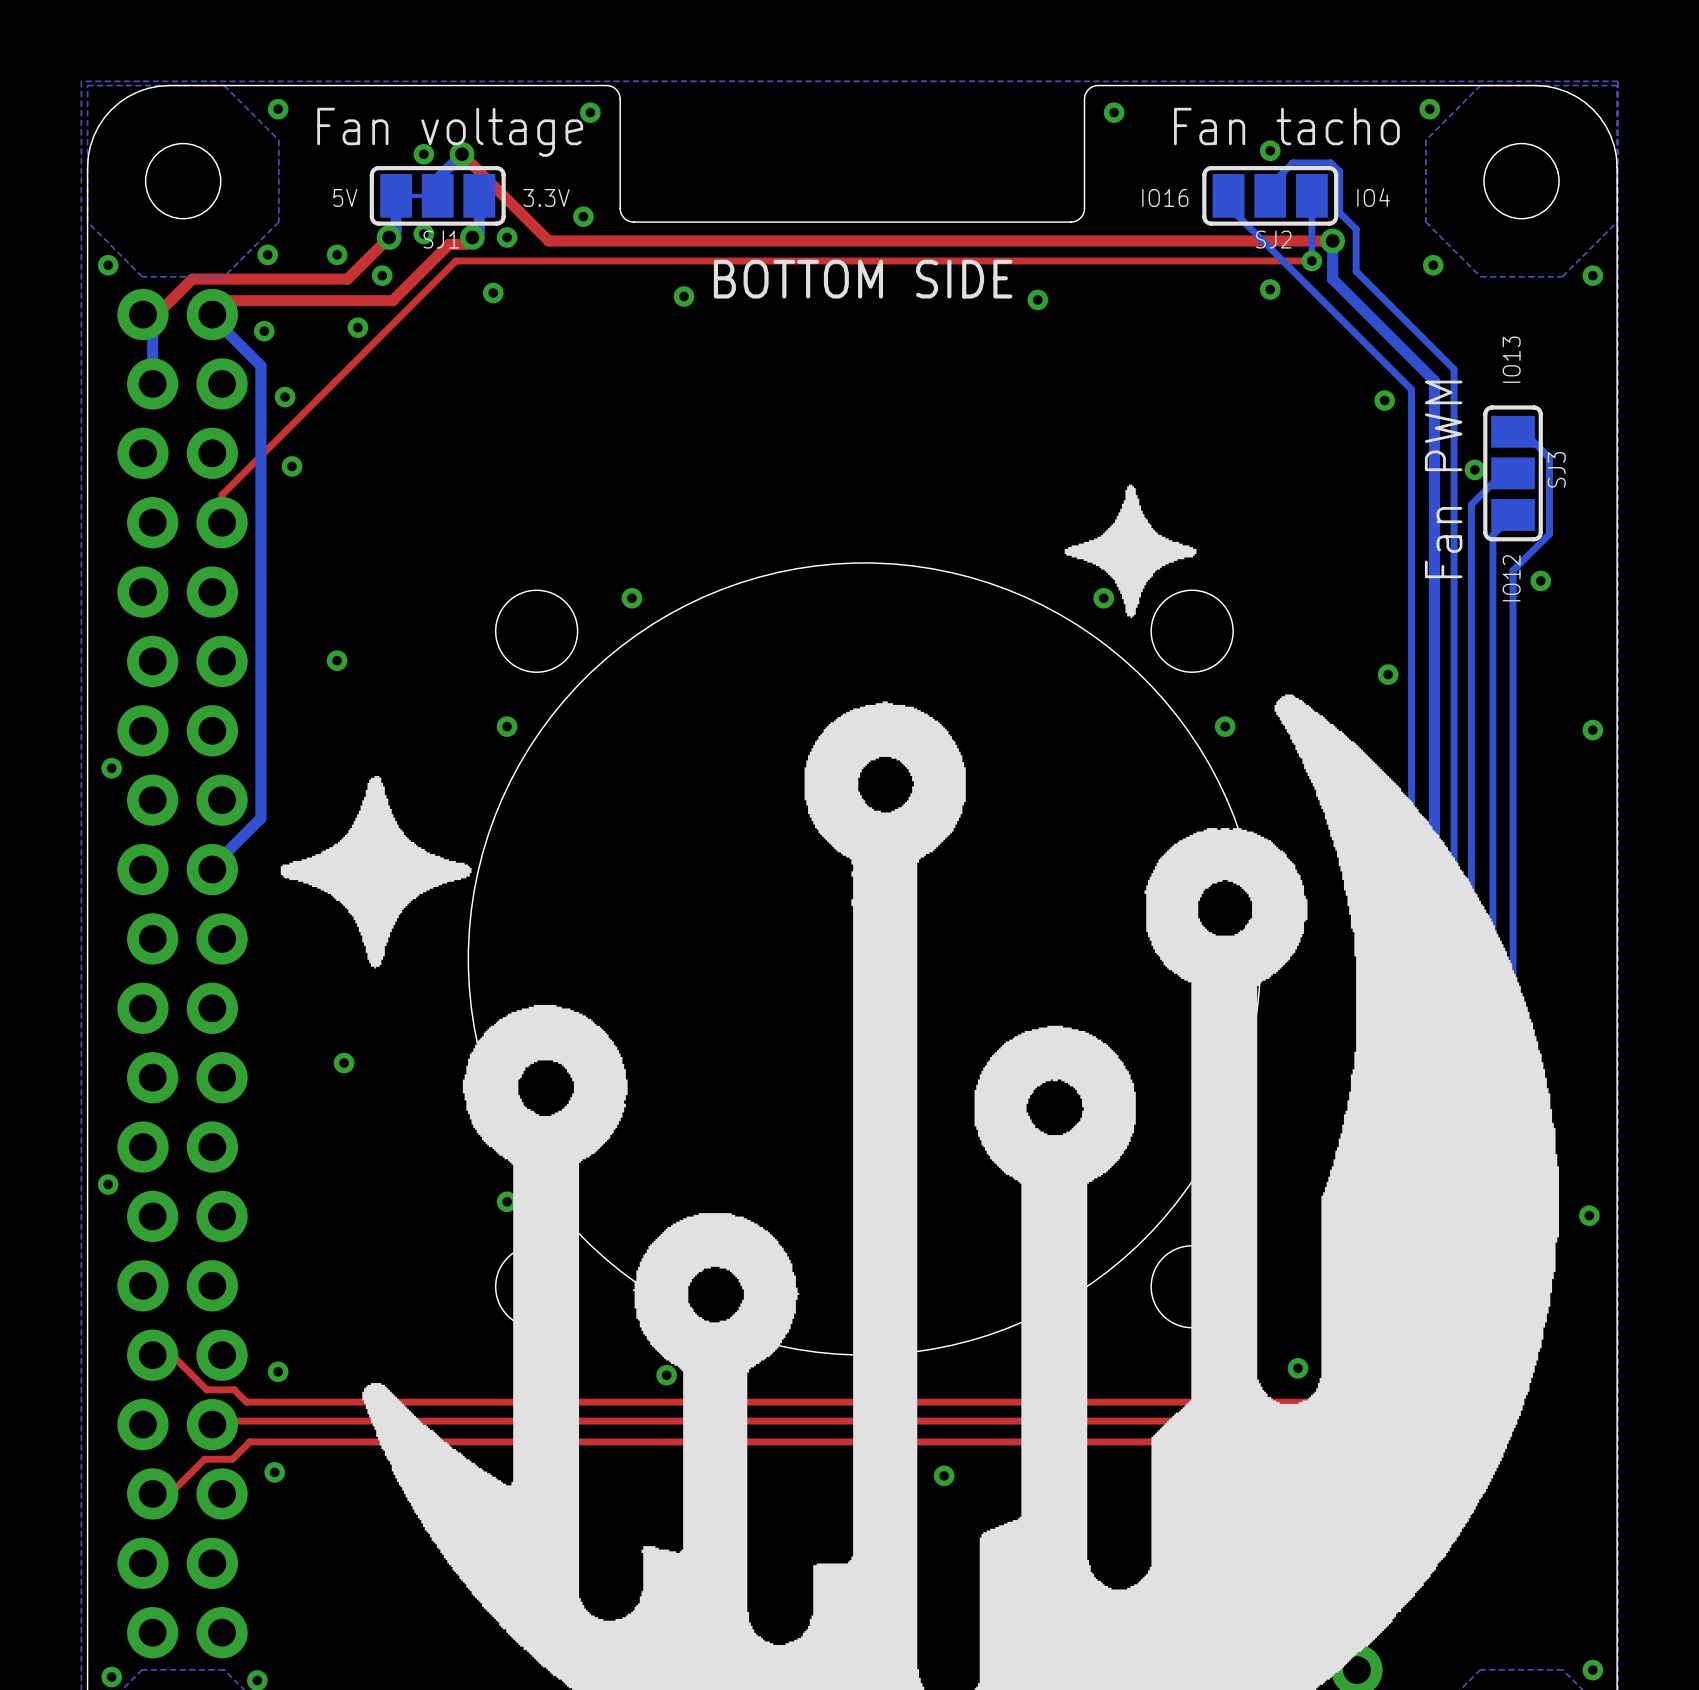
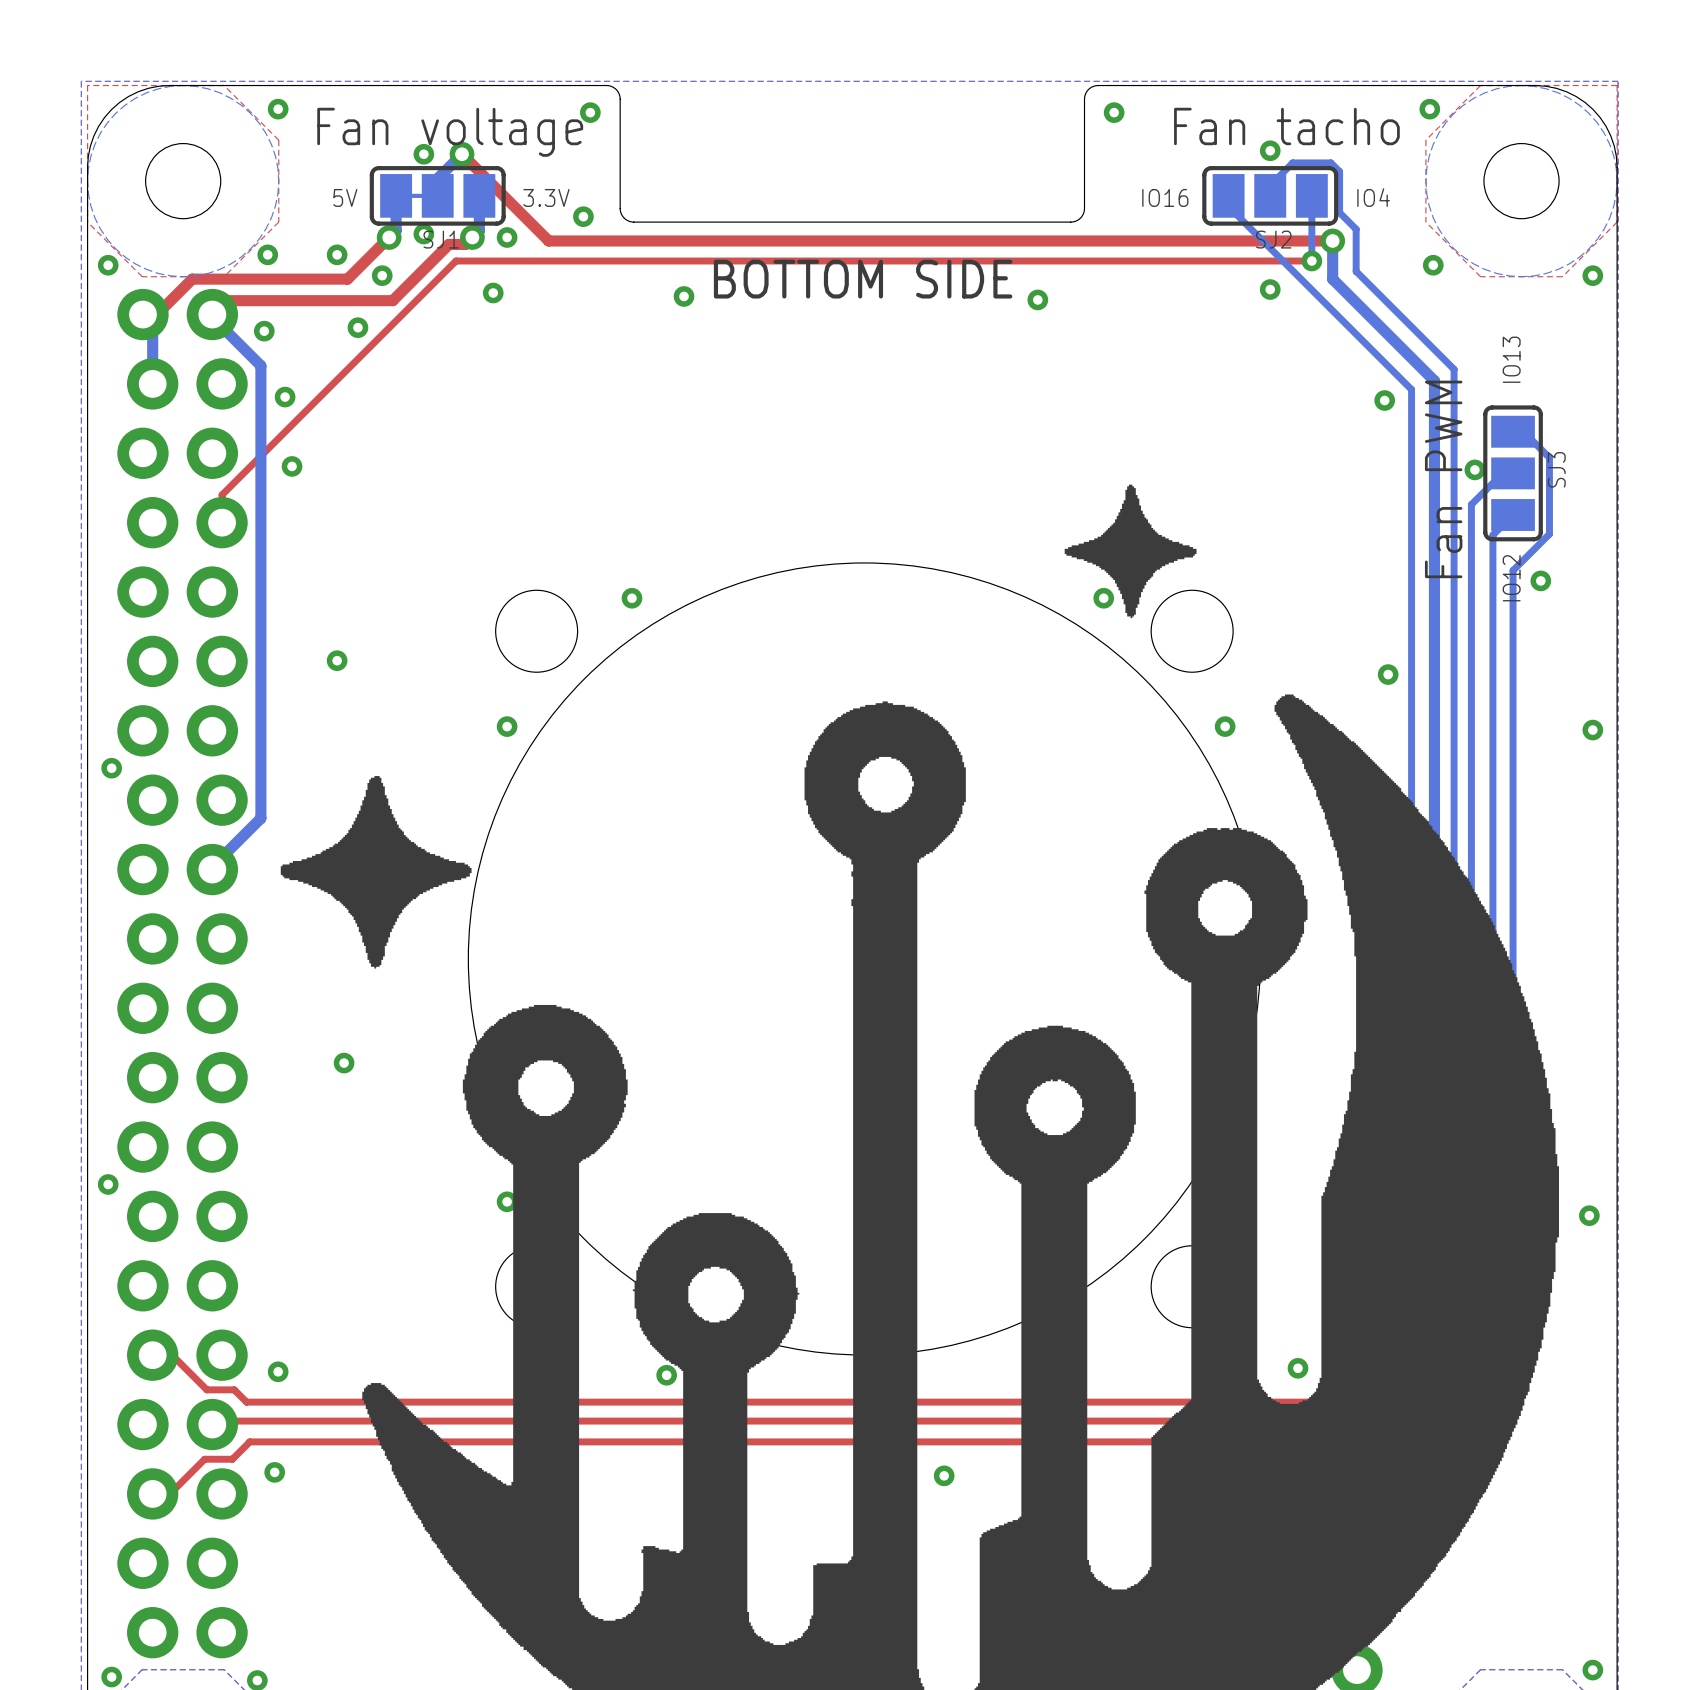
bottom zone outline: (224, 85) (87, 85) (87, 222) (142, 276) (224, 276) (278, 222) (278, 140) (224, 85) -> (183, 85) (207, 88) (219, 92) (230, 98) (250, 113) (259, 122) (271, 144) (275, 156) (278, 181) (275, 205) (271, 217) (259, 239) (250, 248) (241, 256) (219, 269) (207, 273) (183, 276) (158, 273) (146, 269) (124, 256) (115, 248) (107, 239) (94, 217) (90, 205) (87, 181) (90, 156) (94, 144) (107, 122) (115, 113) (135, 98) (146, 92) (158, 88) (183, 85)
bottom zone outline: (1617, 85) (1617, 222) (1562, 276) (1480, 276) (1425, 222) (1425, 140) (1480, 85) (1617, 85) -> (1521, 85) (1546, 88) (1558, 92) (1569, 98) (1589, 113) (1597, 122) (1609, 144) (1616, 168) (1617, 181) (1616, 193) (1609, 217) (1597, 239) (1589, 248) (1579, 256) (1558, 269) (1546, 273) (1521, 276) (1496, 273) (1484, 269) (1463, 256) (1453, 248) (1445, 239) (1433, 217) (1426, 193) (1425, 181) (1426, 168) (1433, 144) (1445, 122) (1453, 113) (1473, 98) (1484, 92) (1496, 88) (1521, 85)

